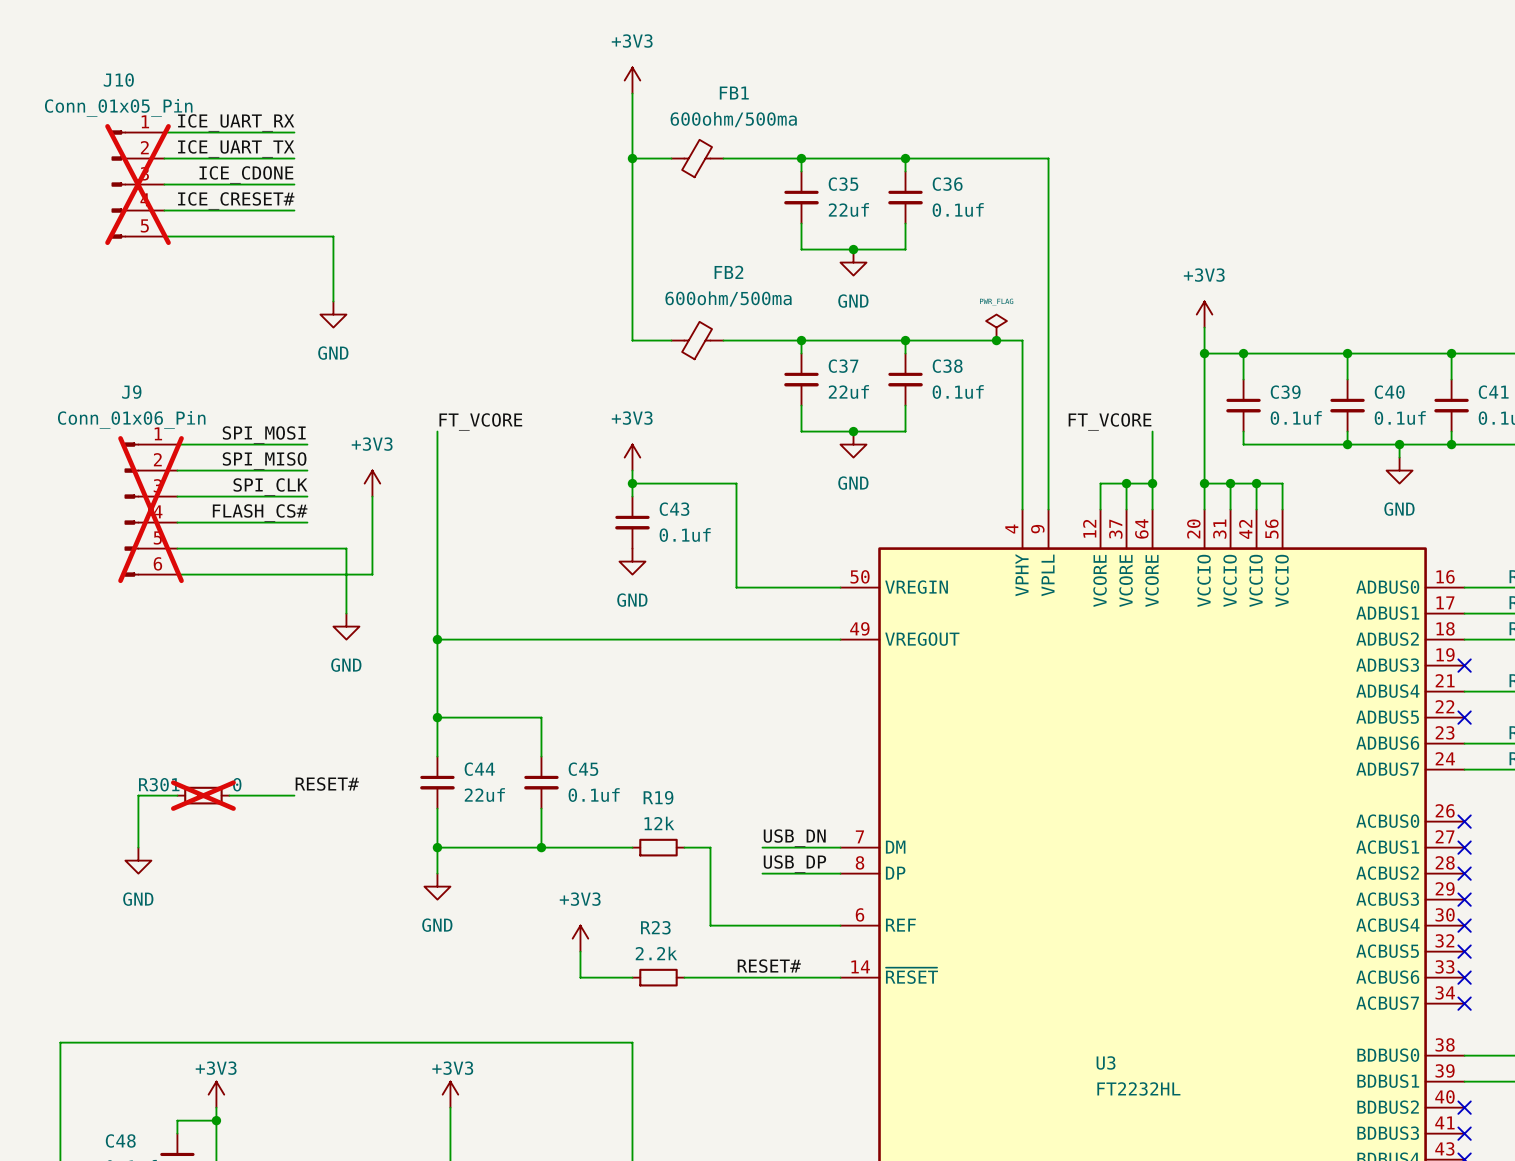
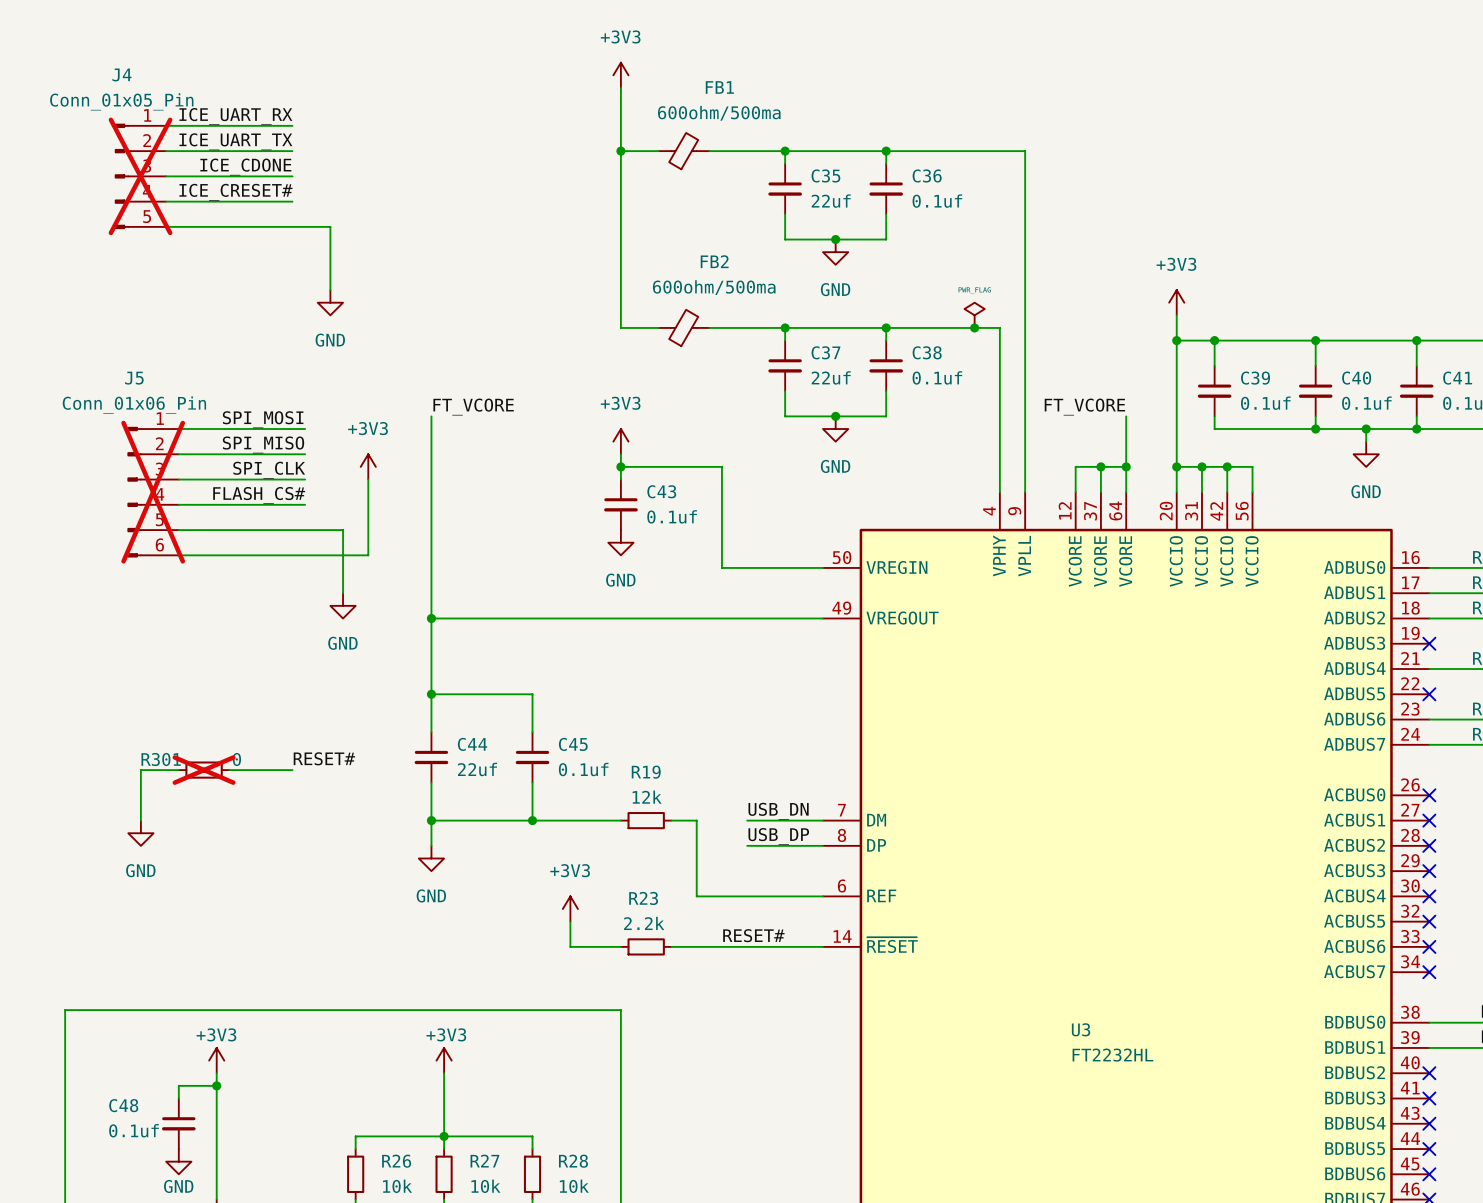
J10 name: J10 (118, 80) -> J4 (122, 74)
J9 name: J9 (131, 392) -> J5 (134, 378)

